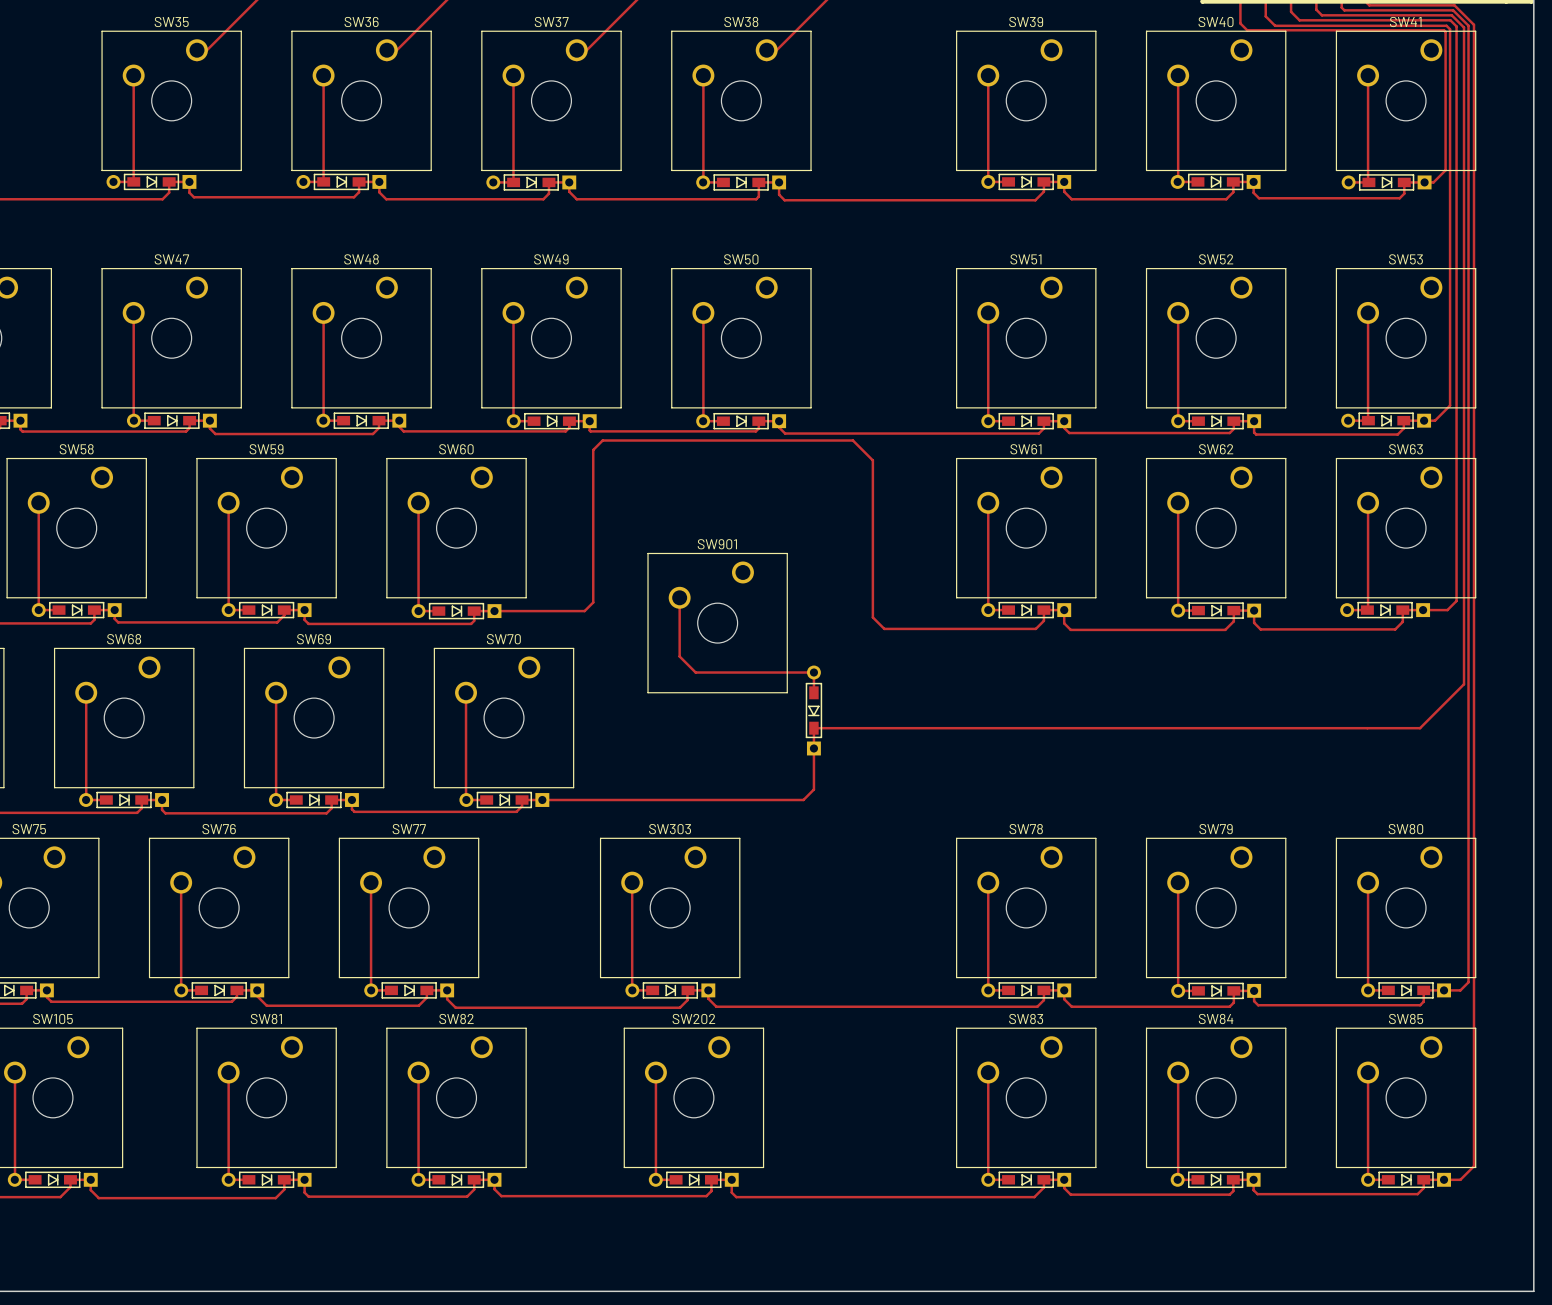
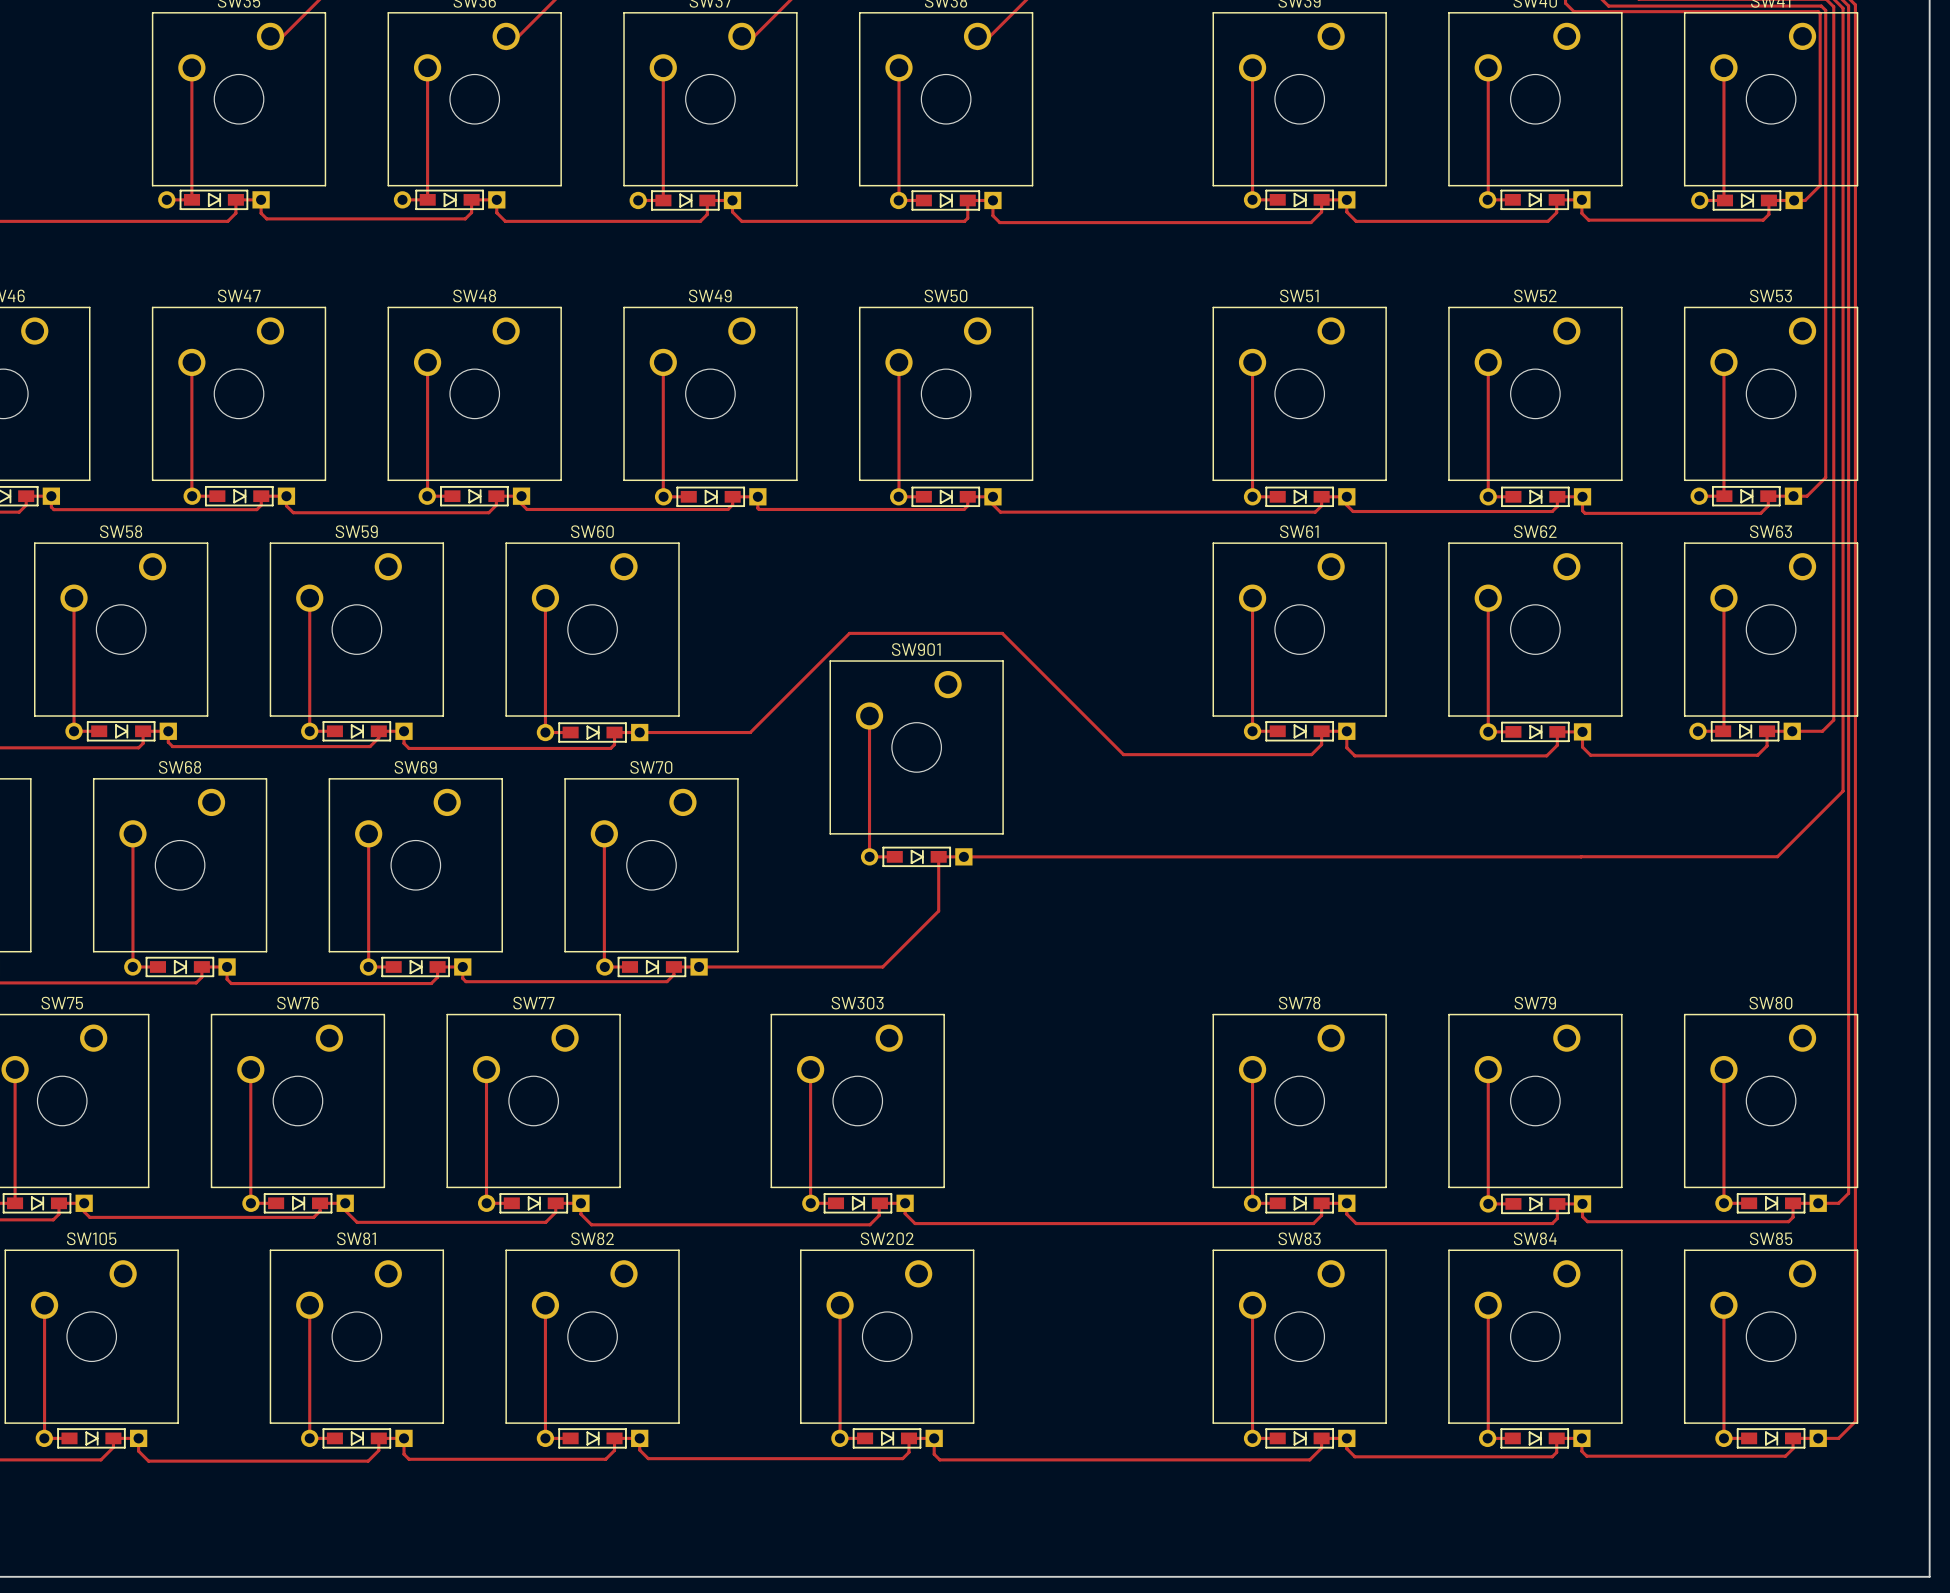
track: (583, 611) (593, 602) (593, 449) (602, 440) (852, 440) (872, 460) (872, 617) -> (750, 732) (849, 633) (1002, 633) (1109, 740)
track: (679, 656) (695, 672) (813, 672) (813, 692) -> (869, 788) (869, 856) (894, 856)
track: (1464, 658) (1464, 684) (1420, 728) (813, 728) (813, 789) (803, 800) (690, 800) -> (1581, 856) (938, 856) (938, 911) (882, 966)
track: none -> (1843, 791) (1777, 856) (1581, 856)
part rotation: 0° (813, 710) -> 90° counterclockwise (916, 856)
part position: (813, 710) -> (916, 856)

